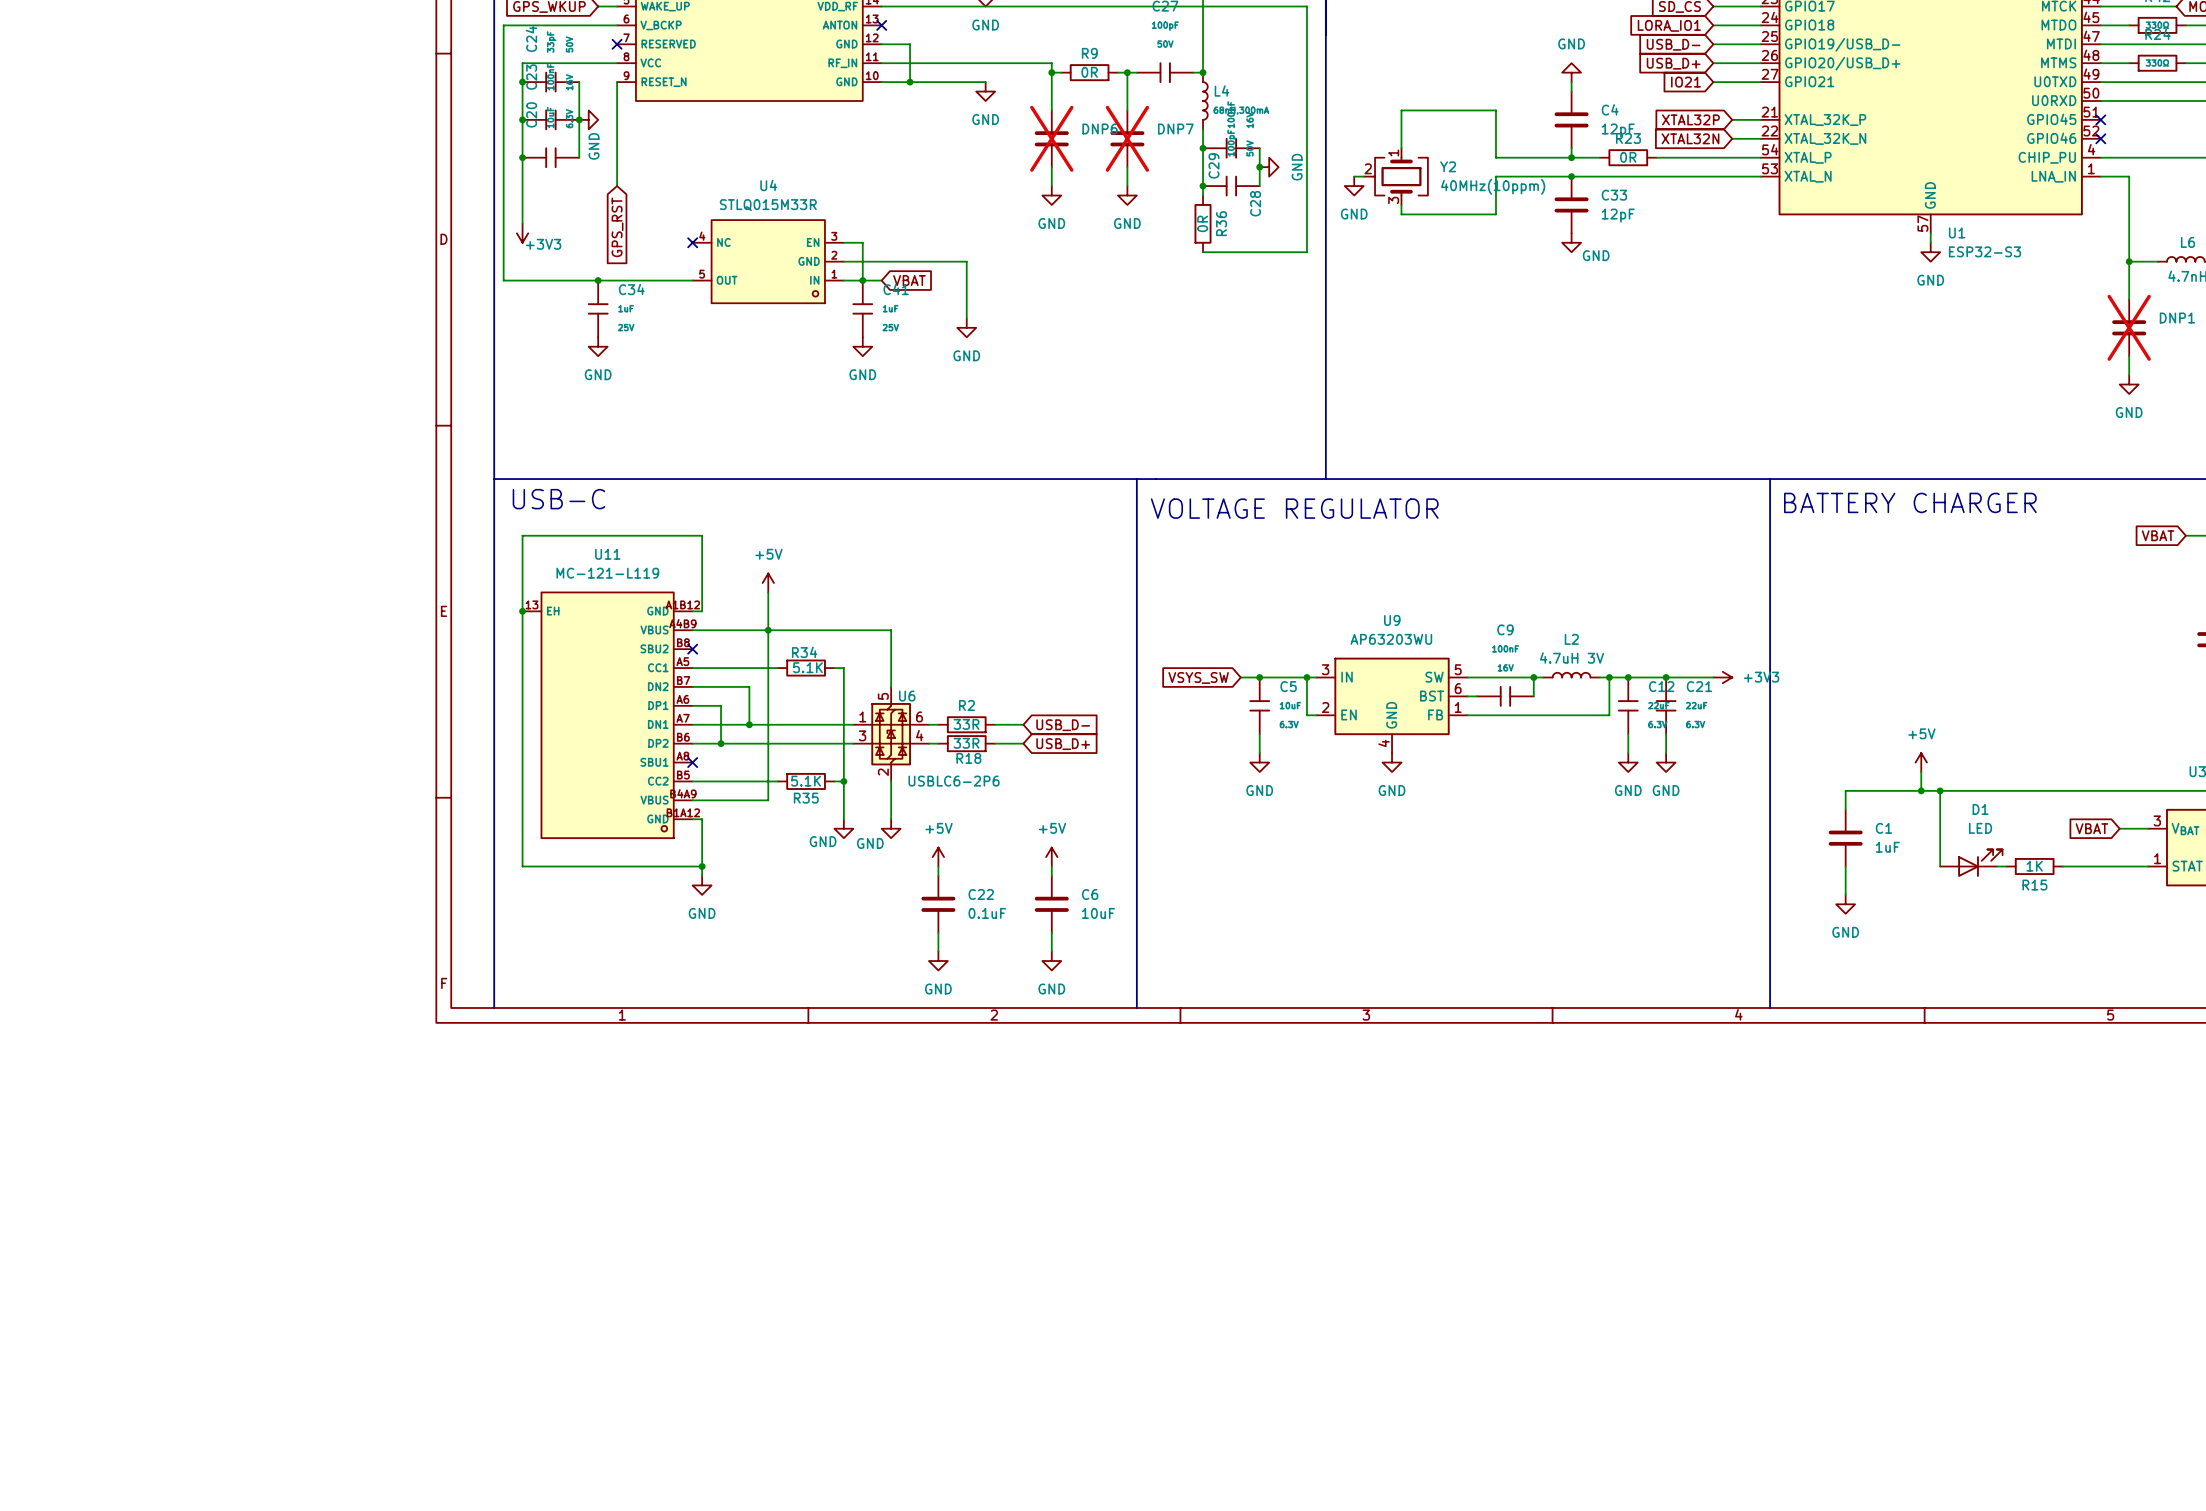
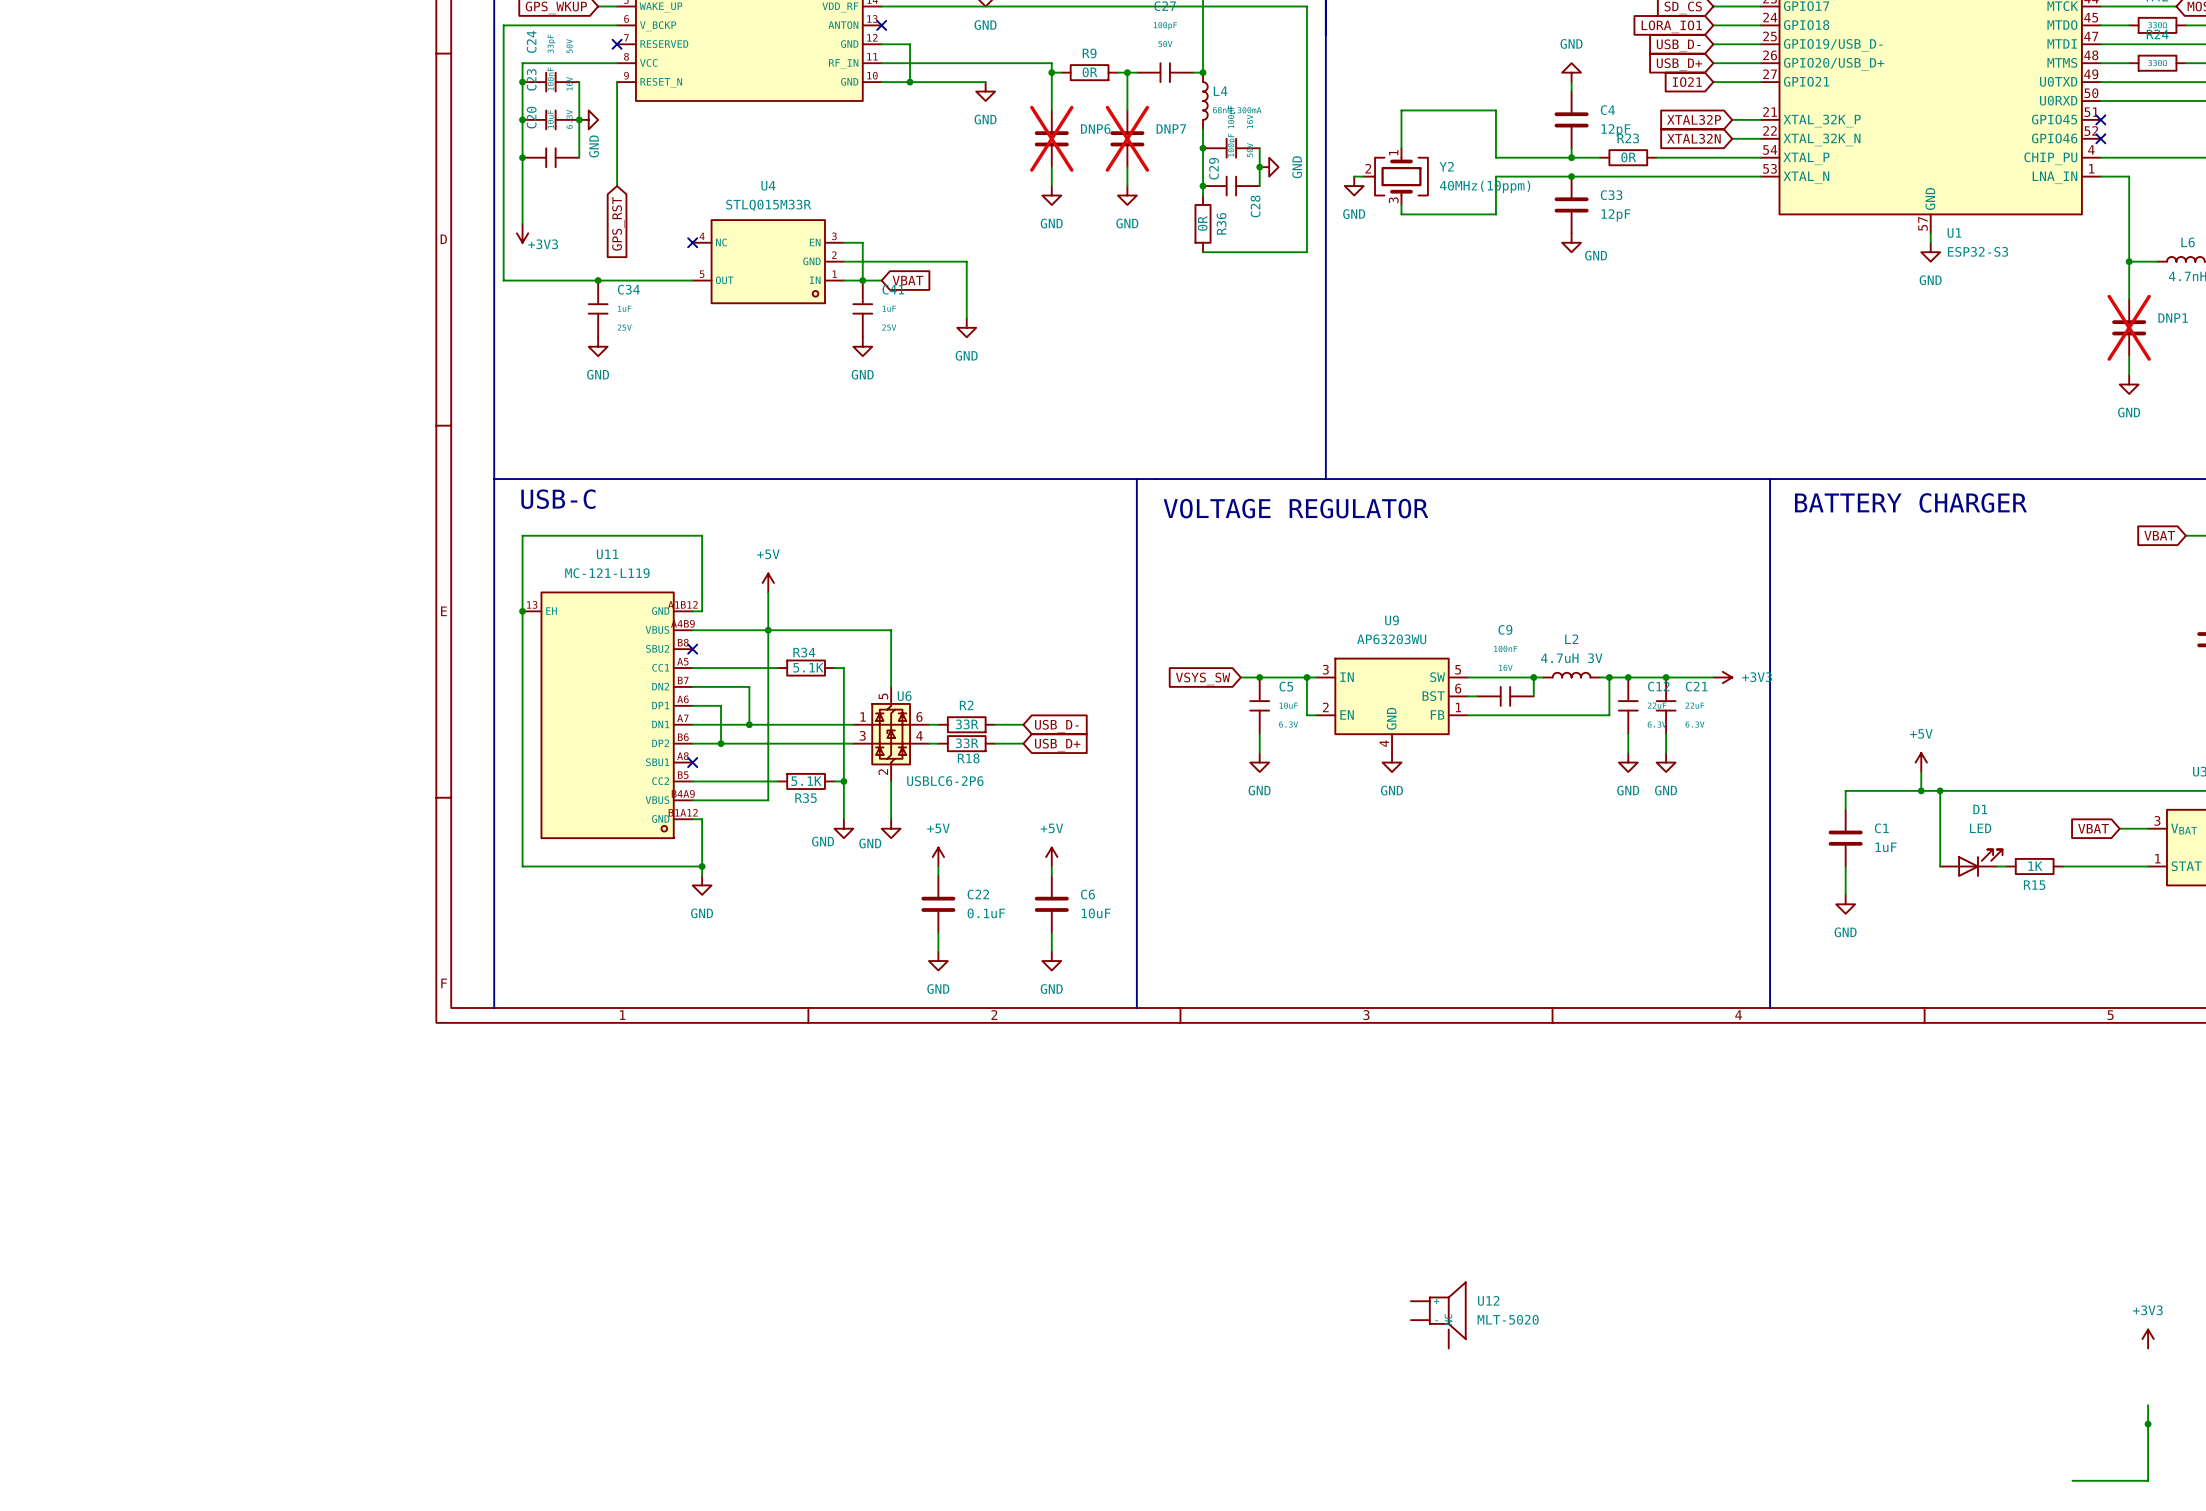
U12: none -> MLT-5020 (1438, 1315)
power symbol: none -> +3V3 (2148, 1339)
wire: none -> (2148, 1405) (2148, 1480) (2072, 1480)
junction: none -> (2148, 1424)

